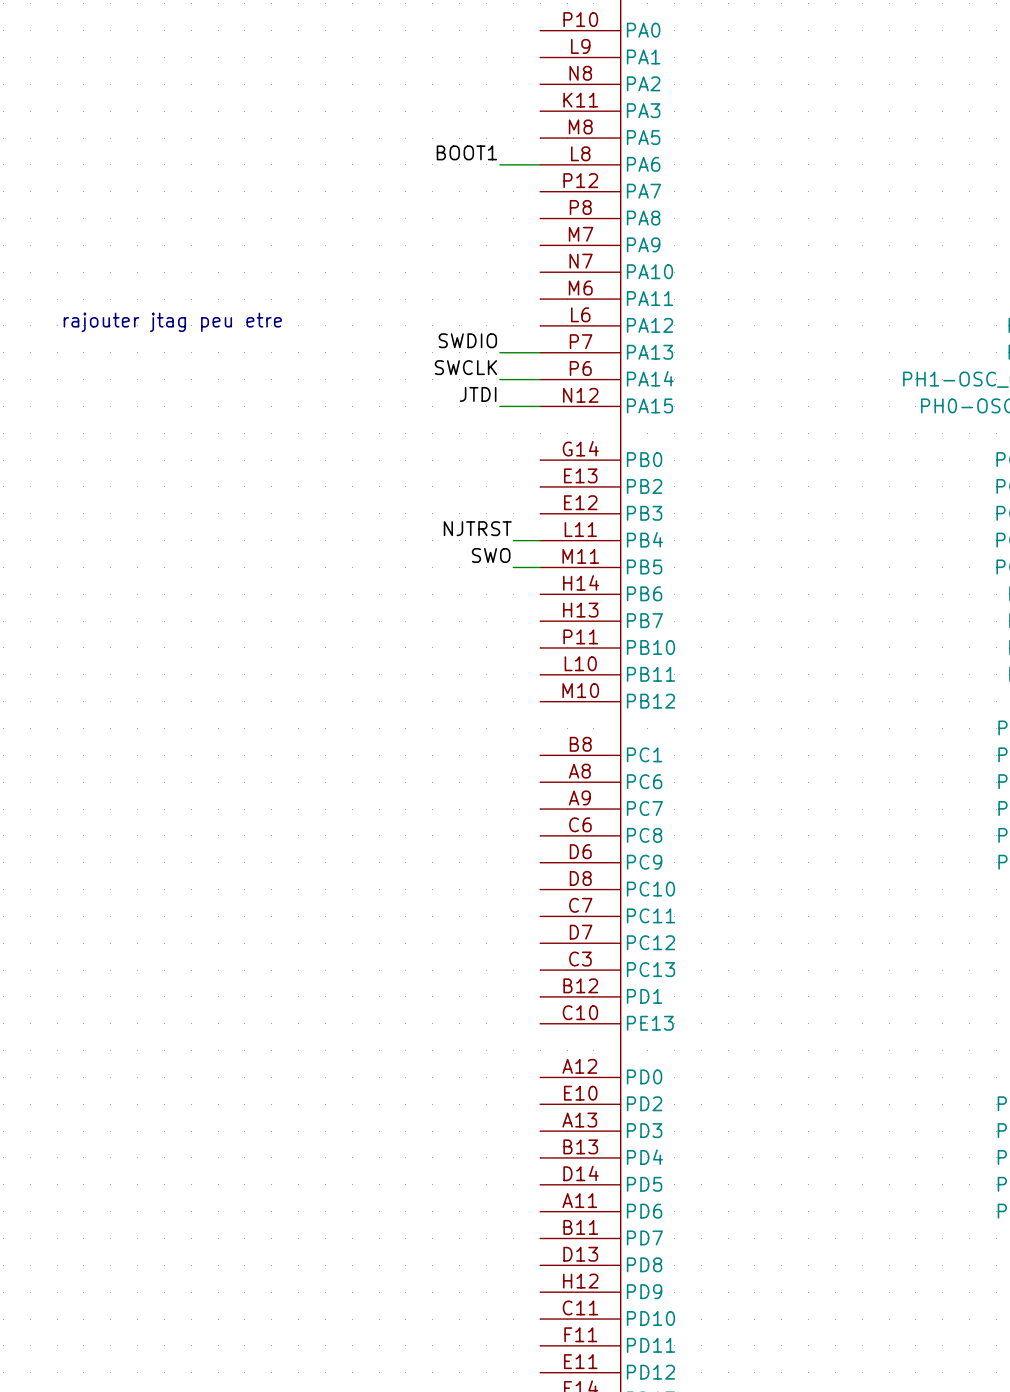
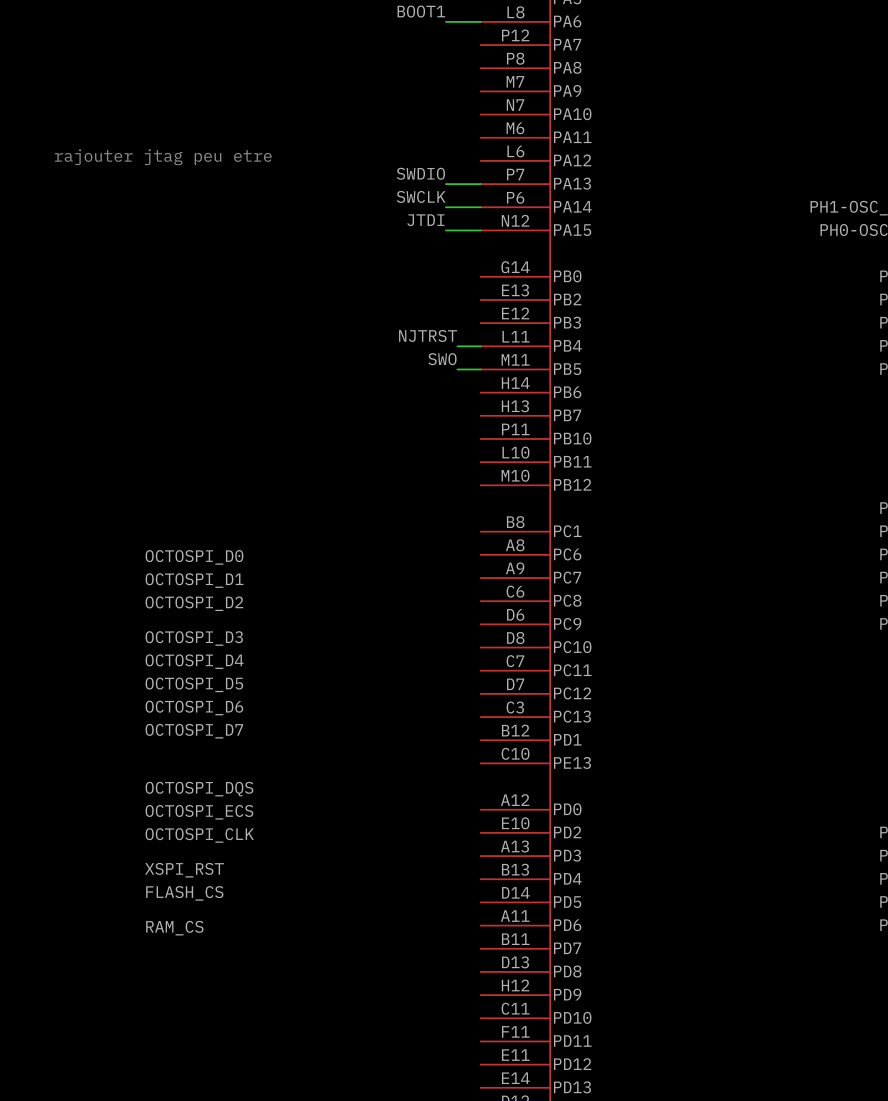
label: none -> OCTOSPI_D0 (194, 557)
label: none -> OCTOSPI_D1 (194, 580)
label: none -> OCTOSPI_D2 (194, 603)
label: none -> OCTOSPI_D3 (194, 638)
label: none -> OCTOSPI_D4 (194, 661)
label: none -> OCTOSPI_D5 (194, 684)
label: none -> OCTOSPI_D6 (194, 708)
label: none -> OCTOSPI_D7 (194, 731)
label: none -> OCTOSPI_DQS (199, 789)
label: none -> OCTOSPI_ECS (199, 812)
label: none -> OCTOSPI_CLK (199, 835)
label: none -> XSPI_RST (184, 870)
label: none -> FLASH_CS (184, 893)
label: none -> RAM_CS (174, 928)

